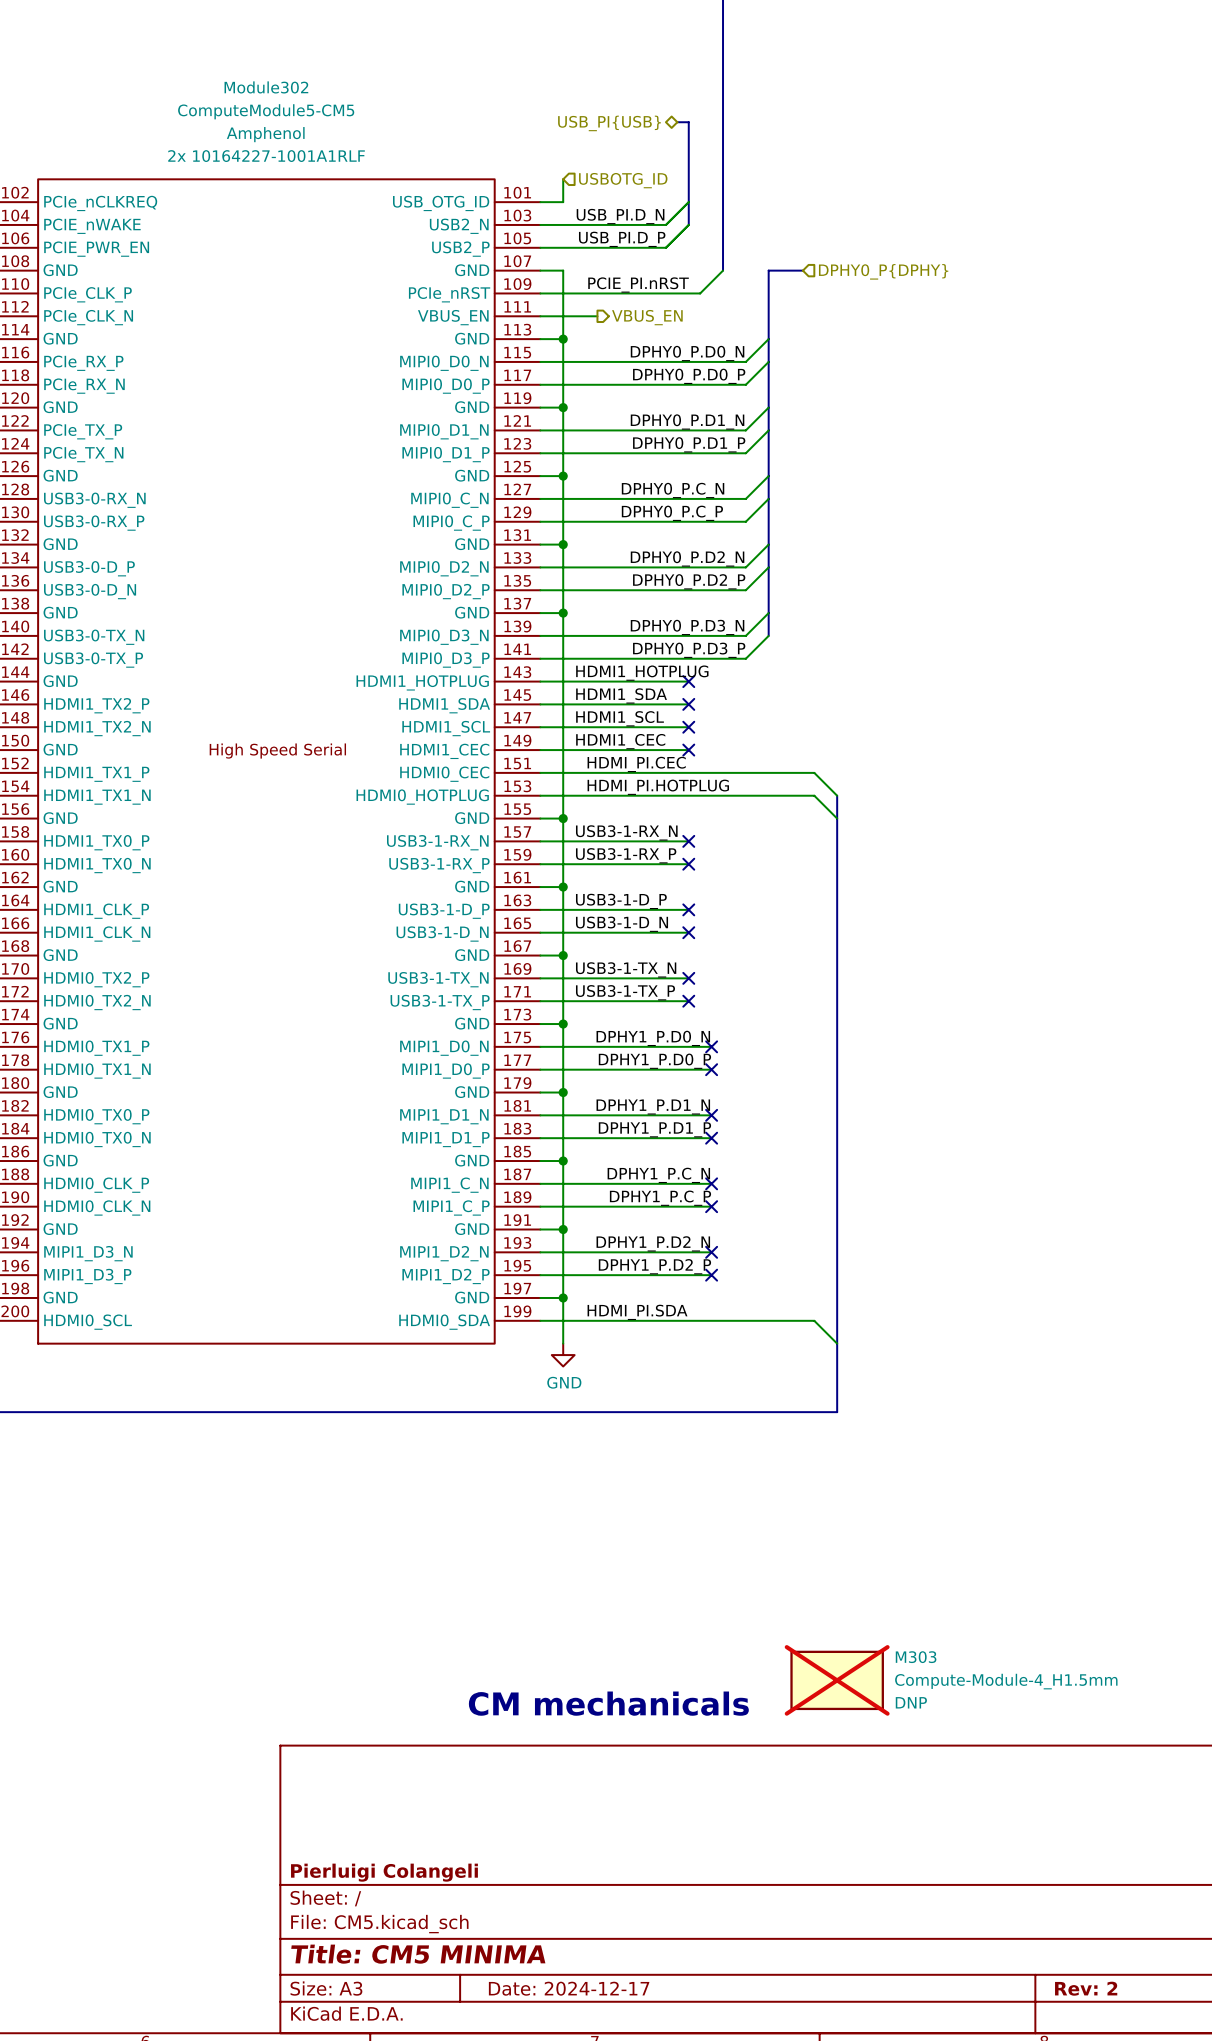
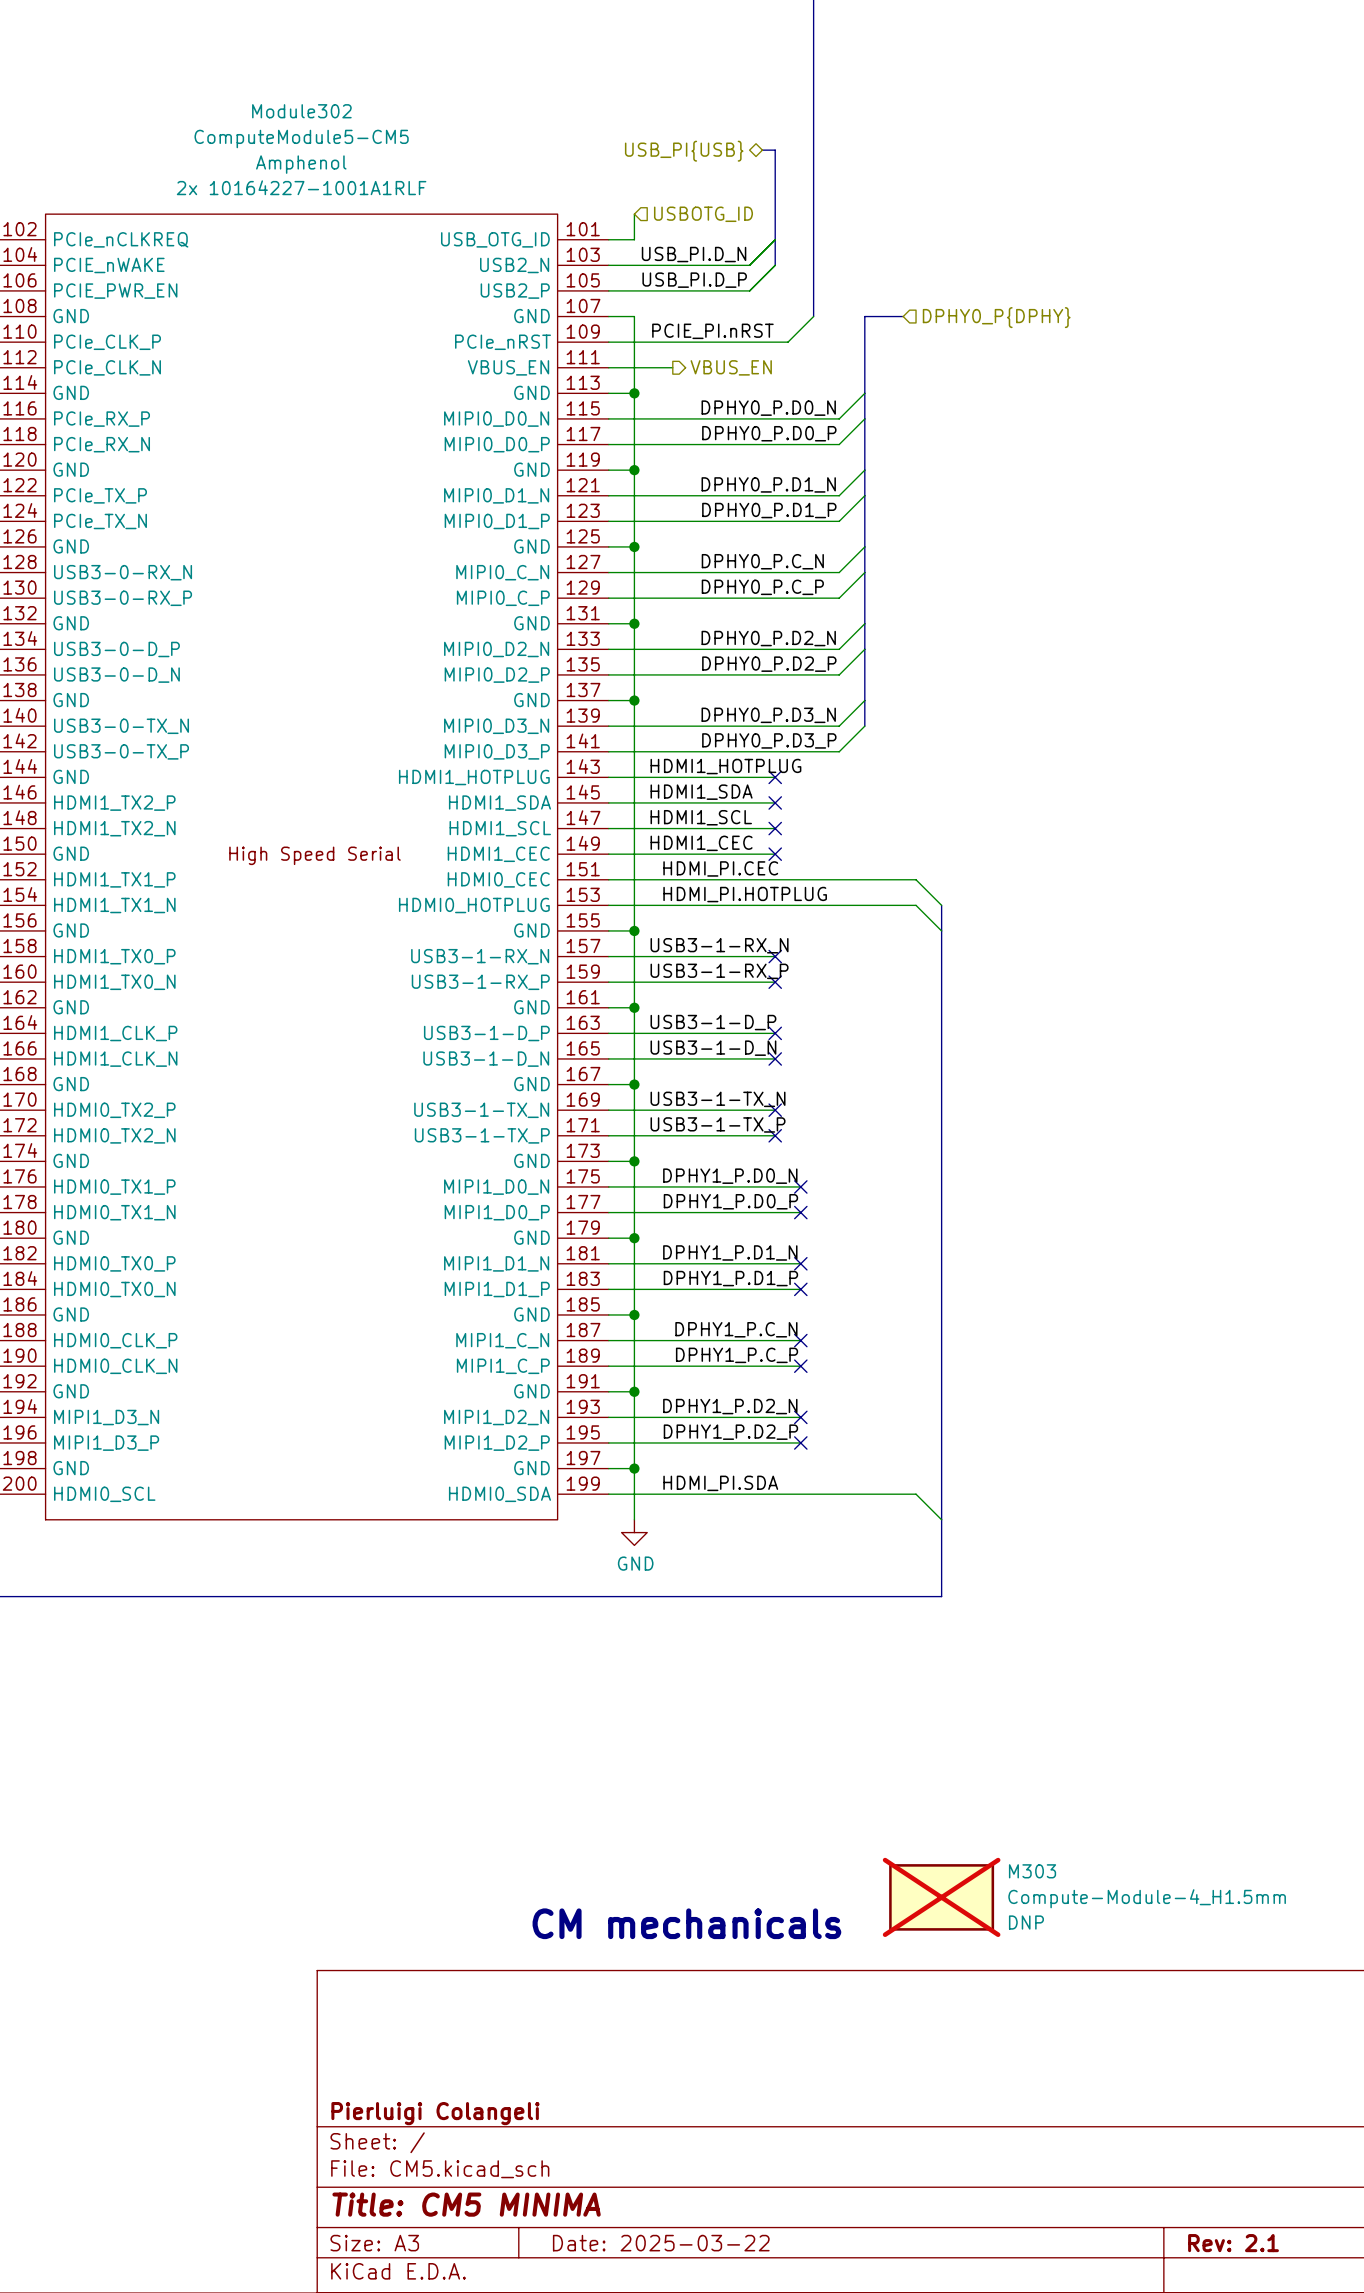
title block: Date: 2024-12-17 (569, 1988) -> Date: 2025-03-22 (661, 2243)
title block: Rev: 2 (1086, 1988) -> Rev: 2.1 (1233, 2243)

